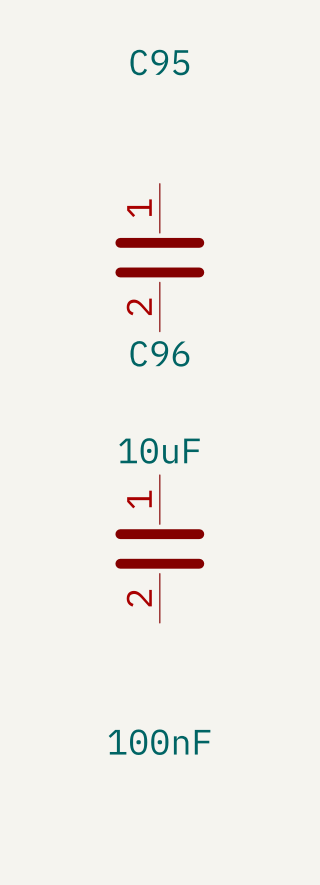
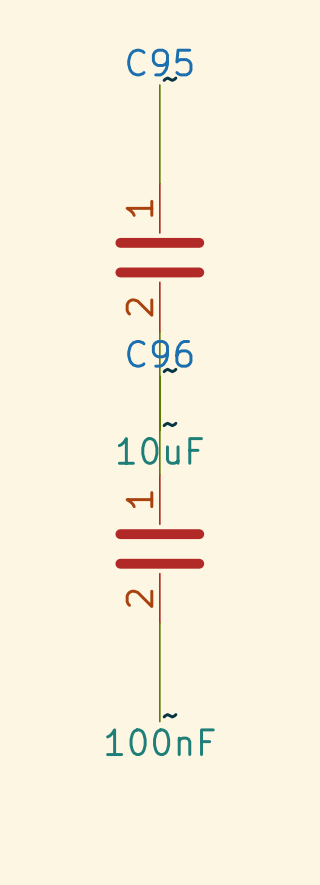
label: none -> ~ (169, 79)
wire: none -> (159, 85) (159, 183)
wire: none -> (159, 331) (159, 474)
label: none -> ~ (169, 370)
label: none -> ~ (169, 424)
wire: none -> (159, 622) (159, 721)
label: none -> ~ (169, 715)

